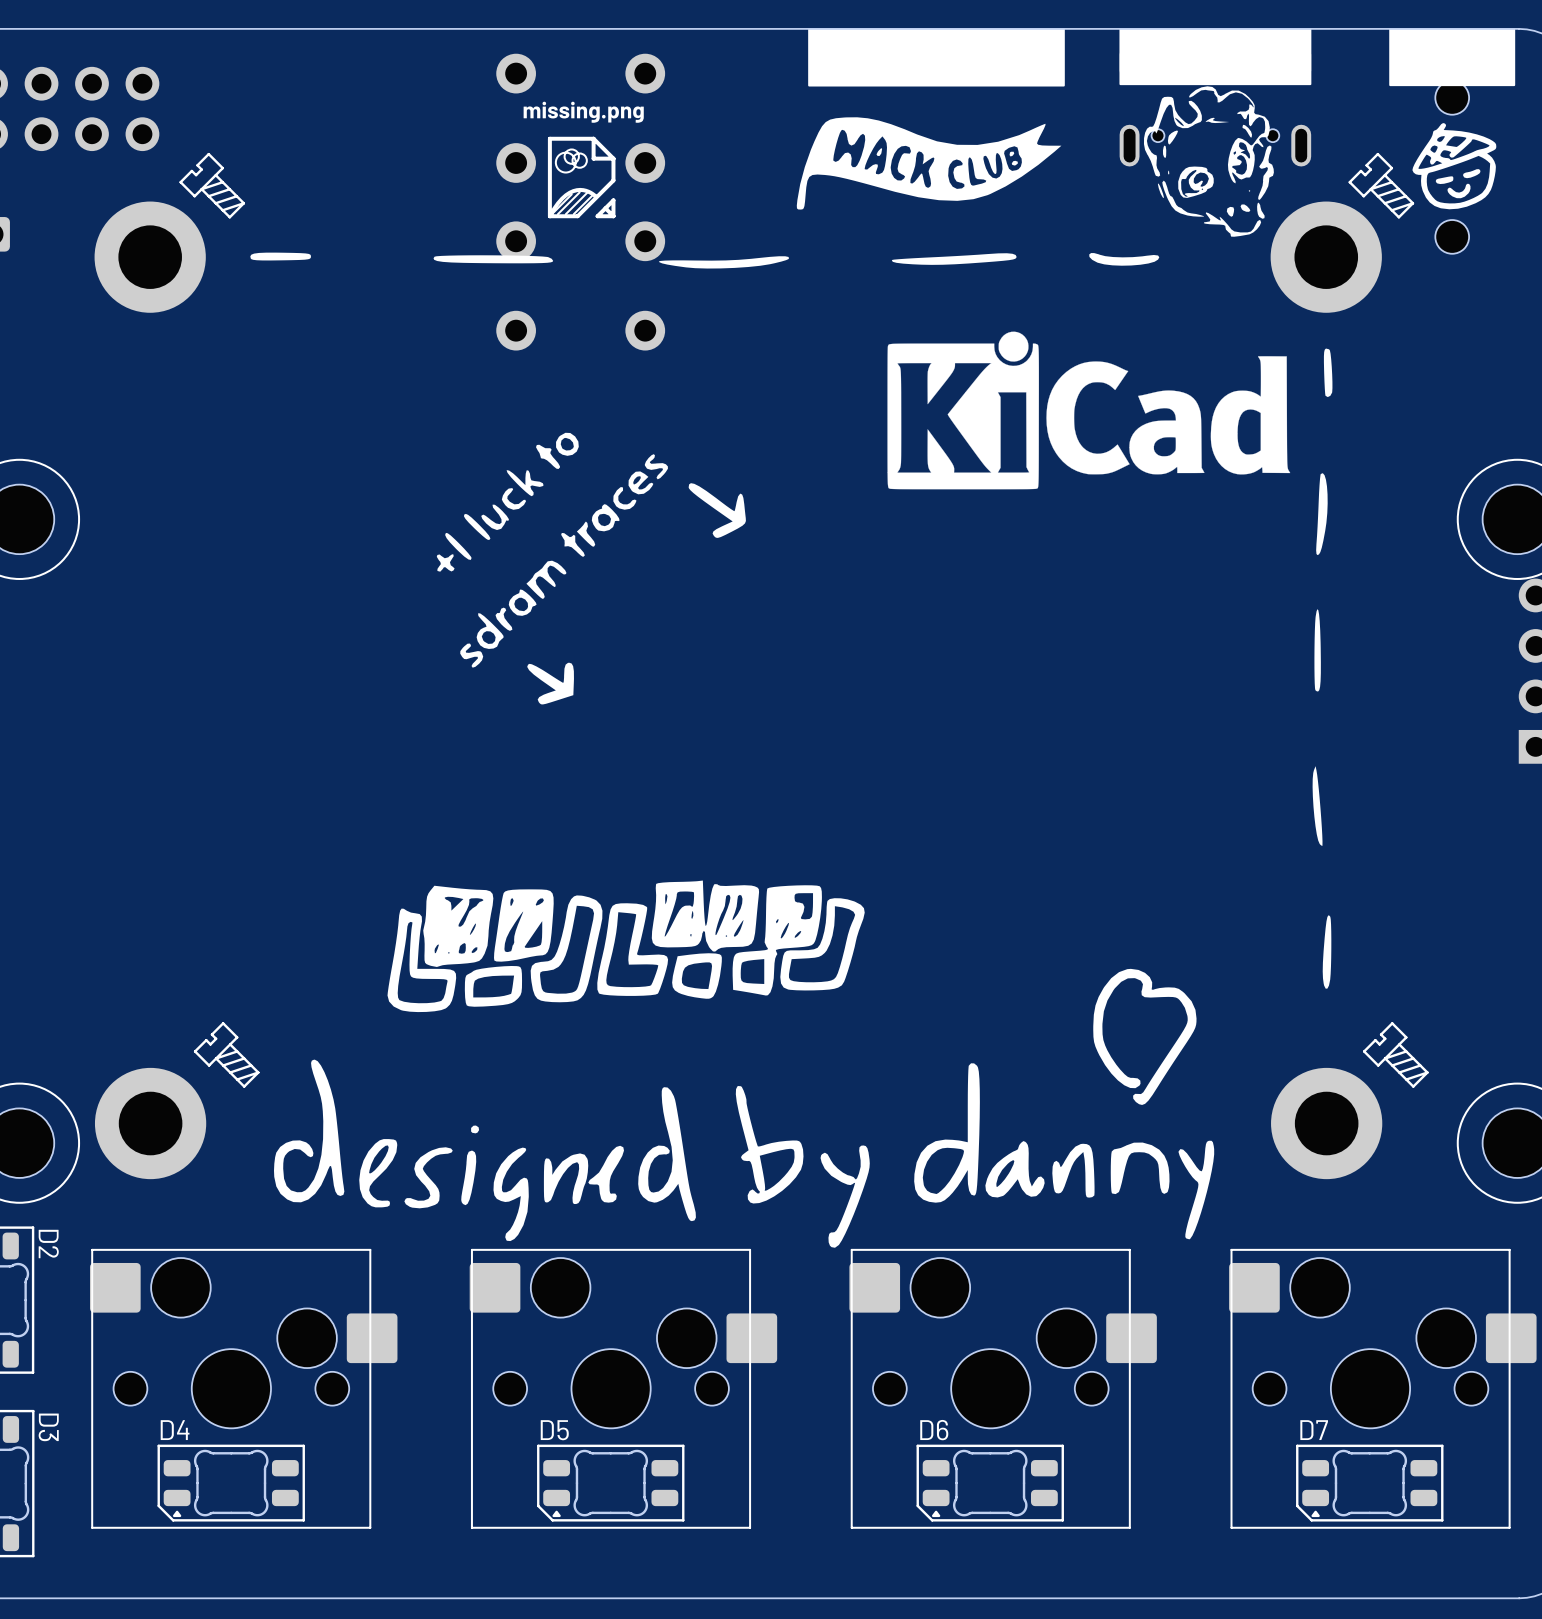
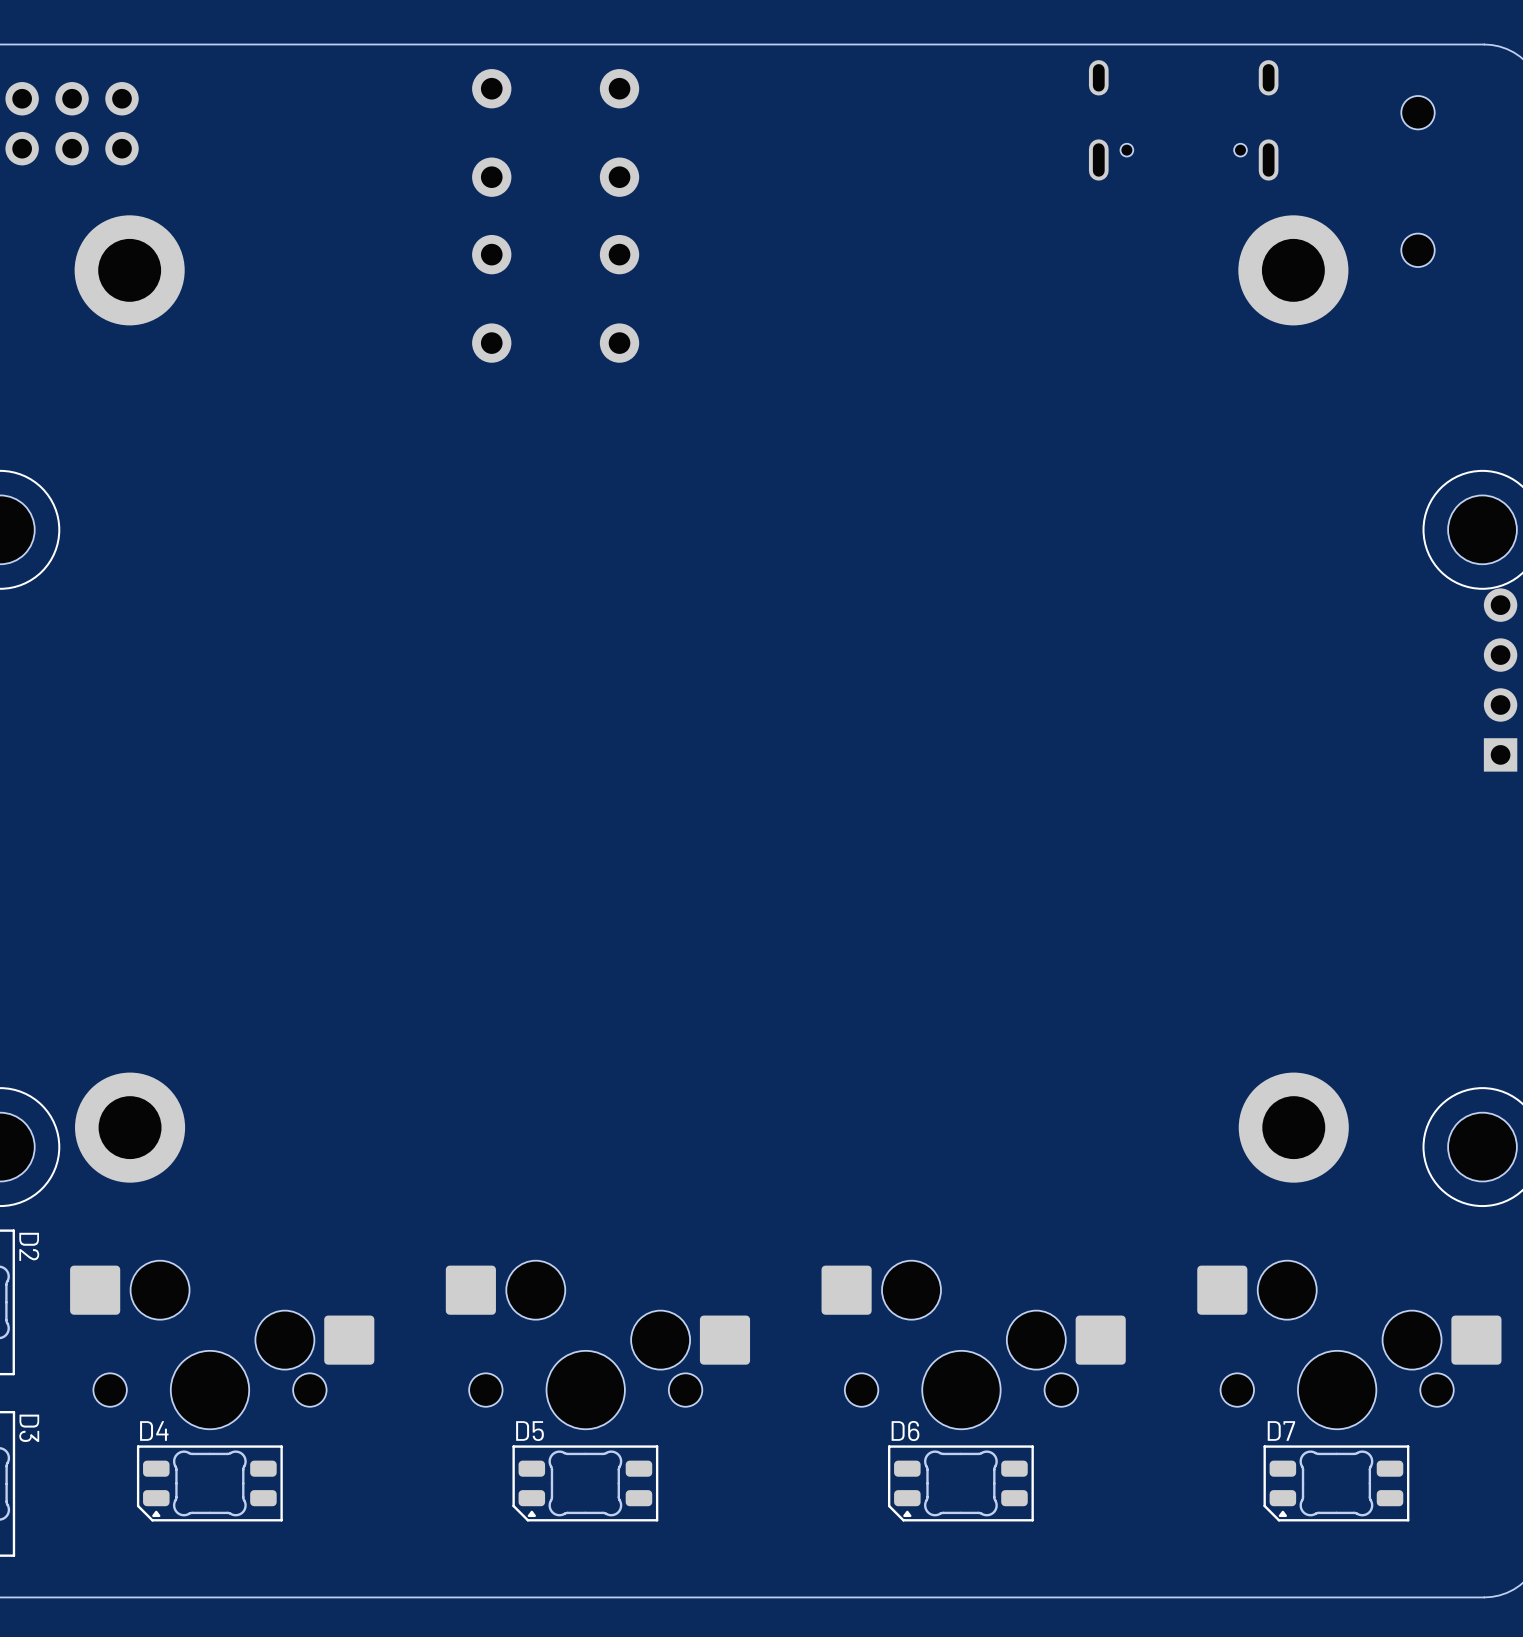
drawing: [179, 28, 1497, 1248] -> none
drawing: [1389, 28, 1516, 87] -> none
text: missing.png (583, 112) -> none
drawing: [1362, 1022, 1429, 1088] -> none
line: (370, 1249) (92, 1249) (92, 1527) (370, 1527) (370, 1249) -> none
line: (750, 1249) (471, 1249) (471, 1527) (750, 1527) (750, 1249) -> none
line: (1129, 1249) (851, 1249) (851, 1527) (1129, 1527) (1129, 1249) -> none
line: (1509, 1249) (1231, 1249) (1231, 1527) (1509, 1527) (1509, 1249) -> none

